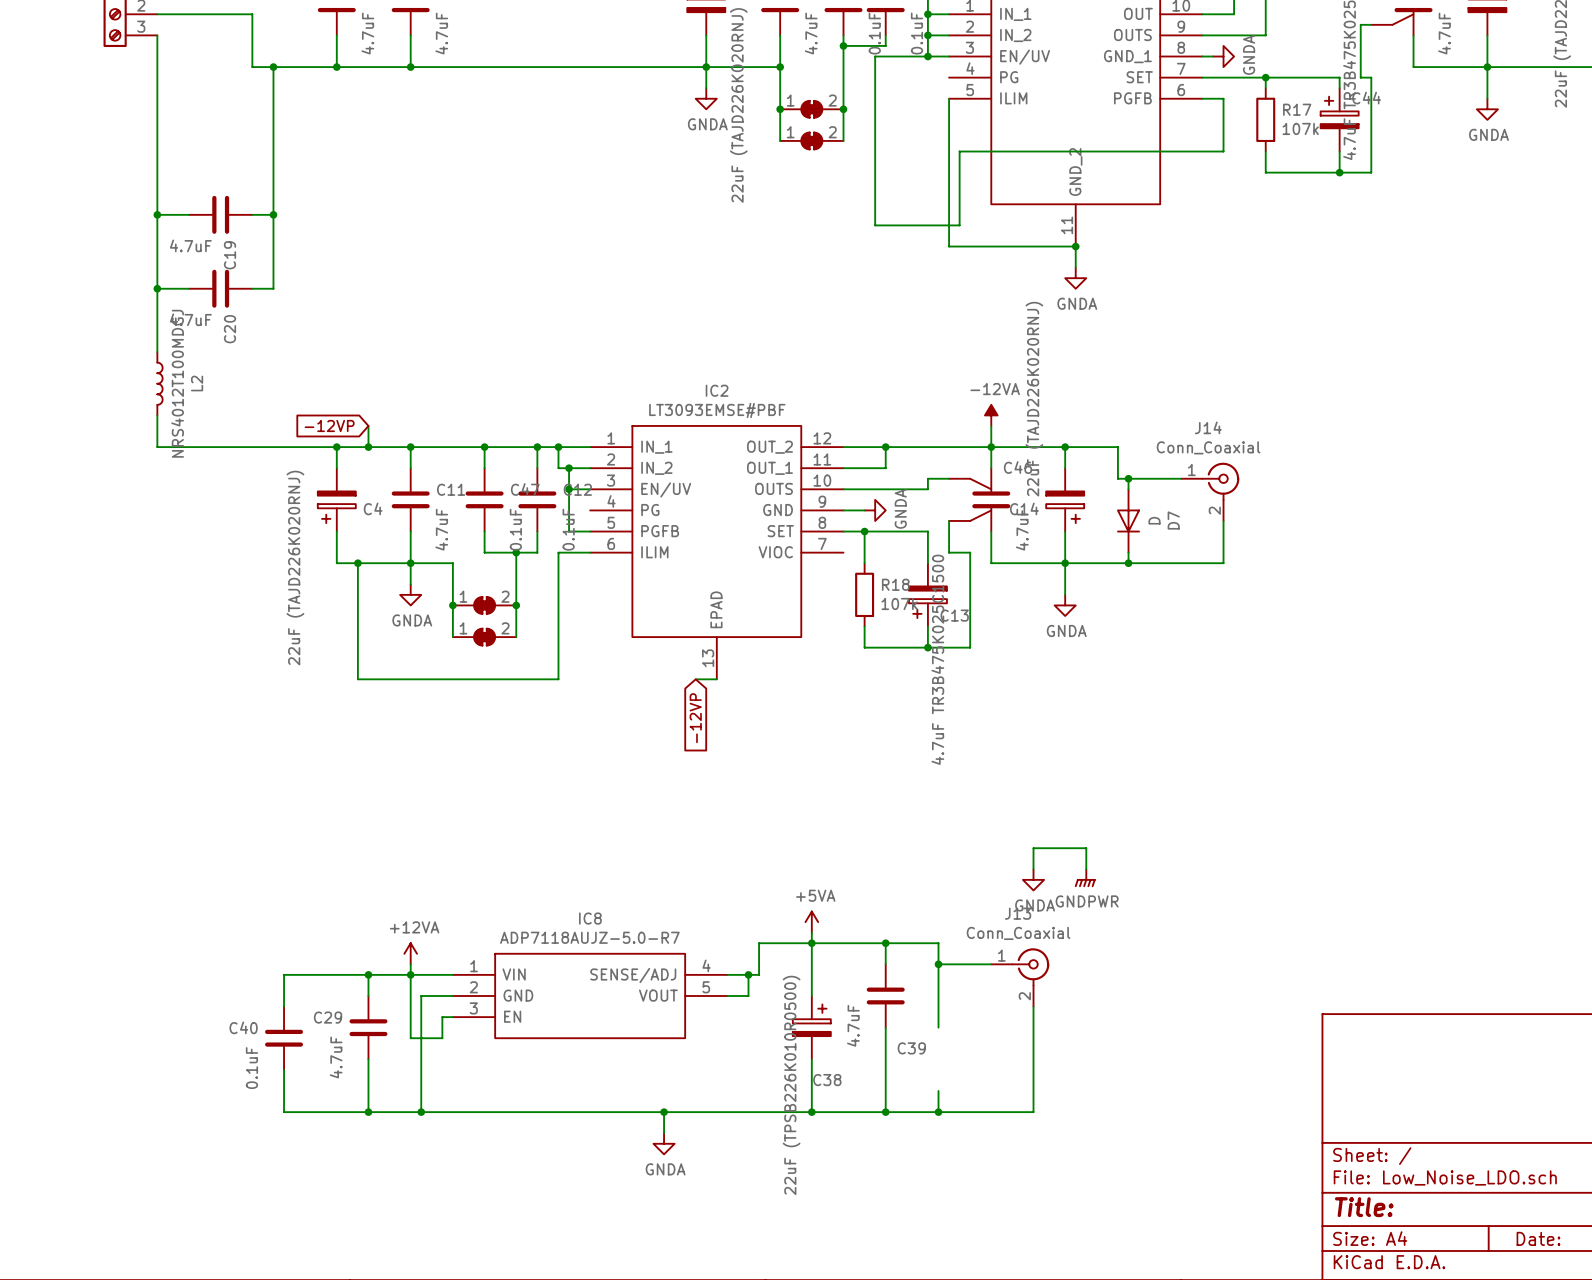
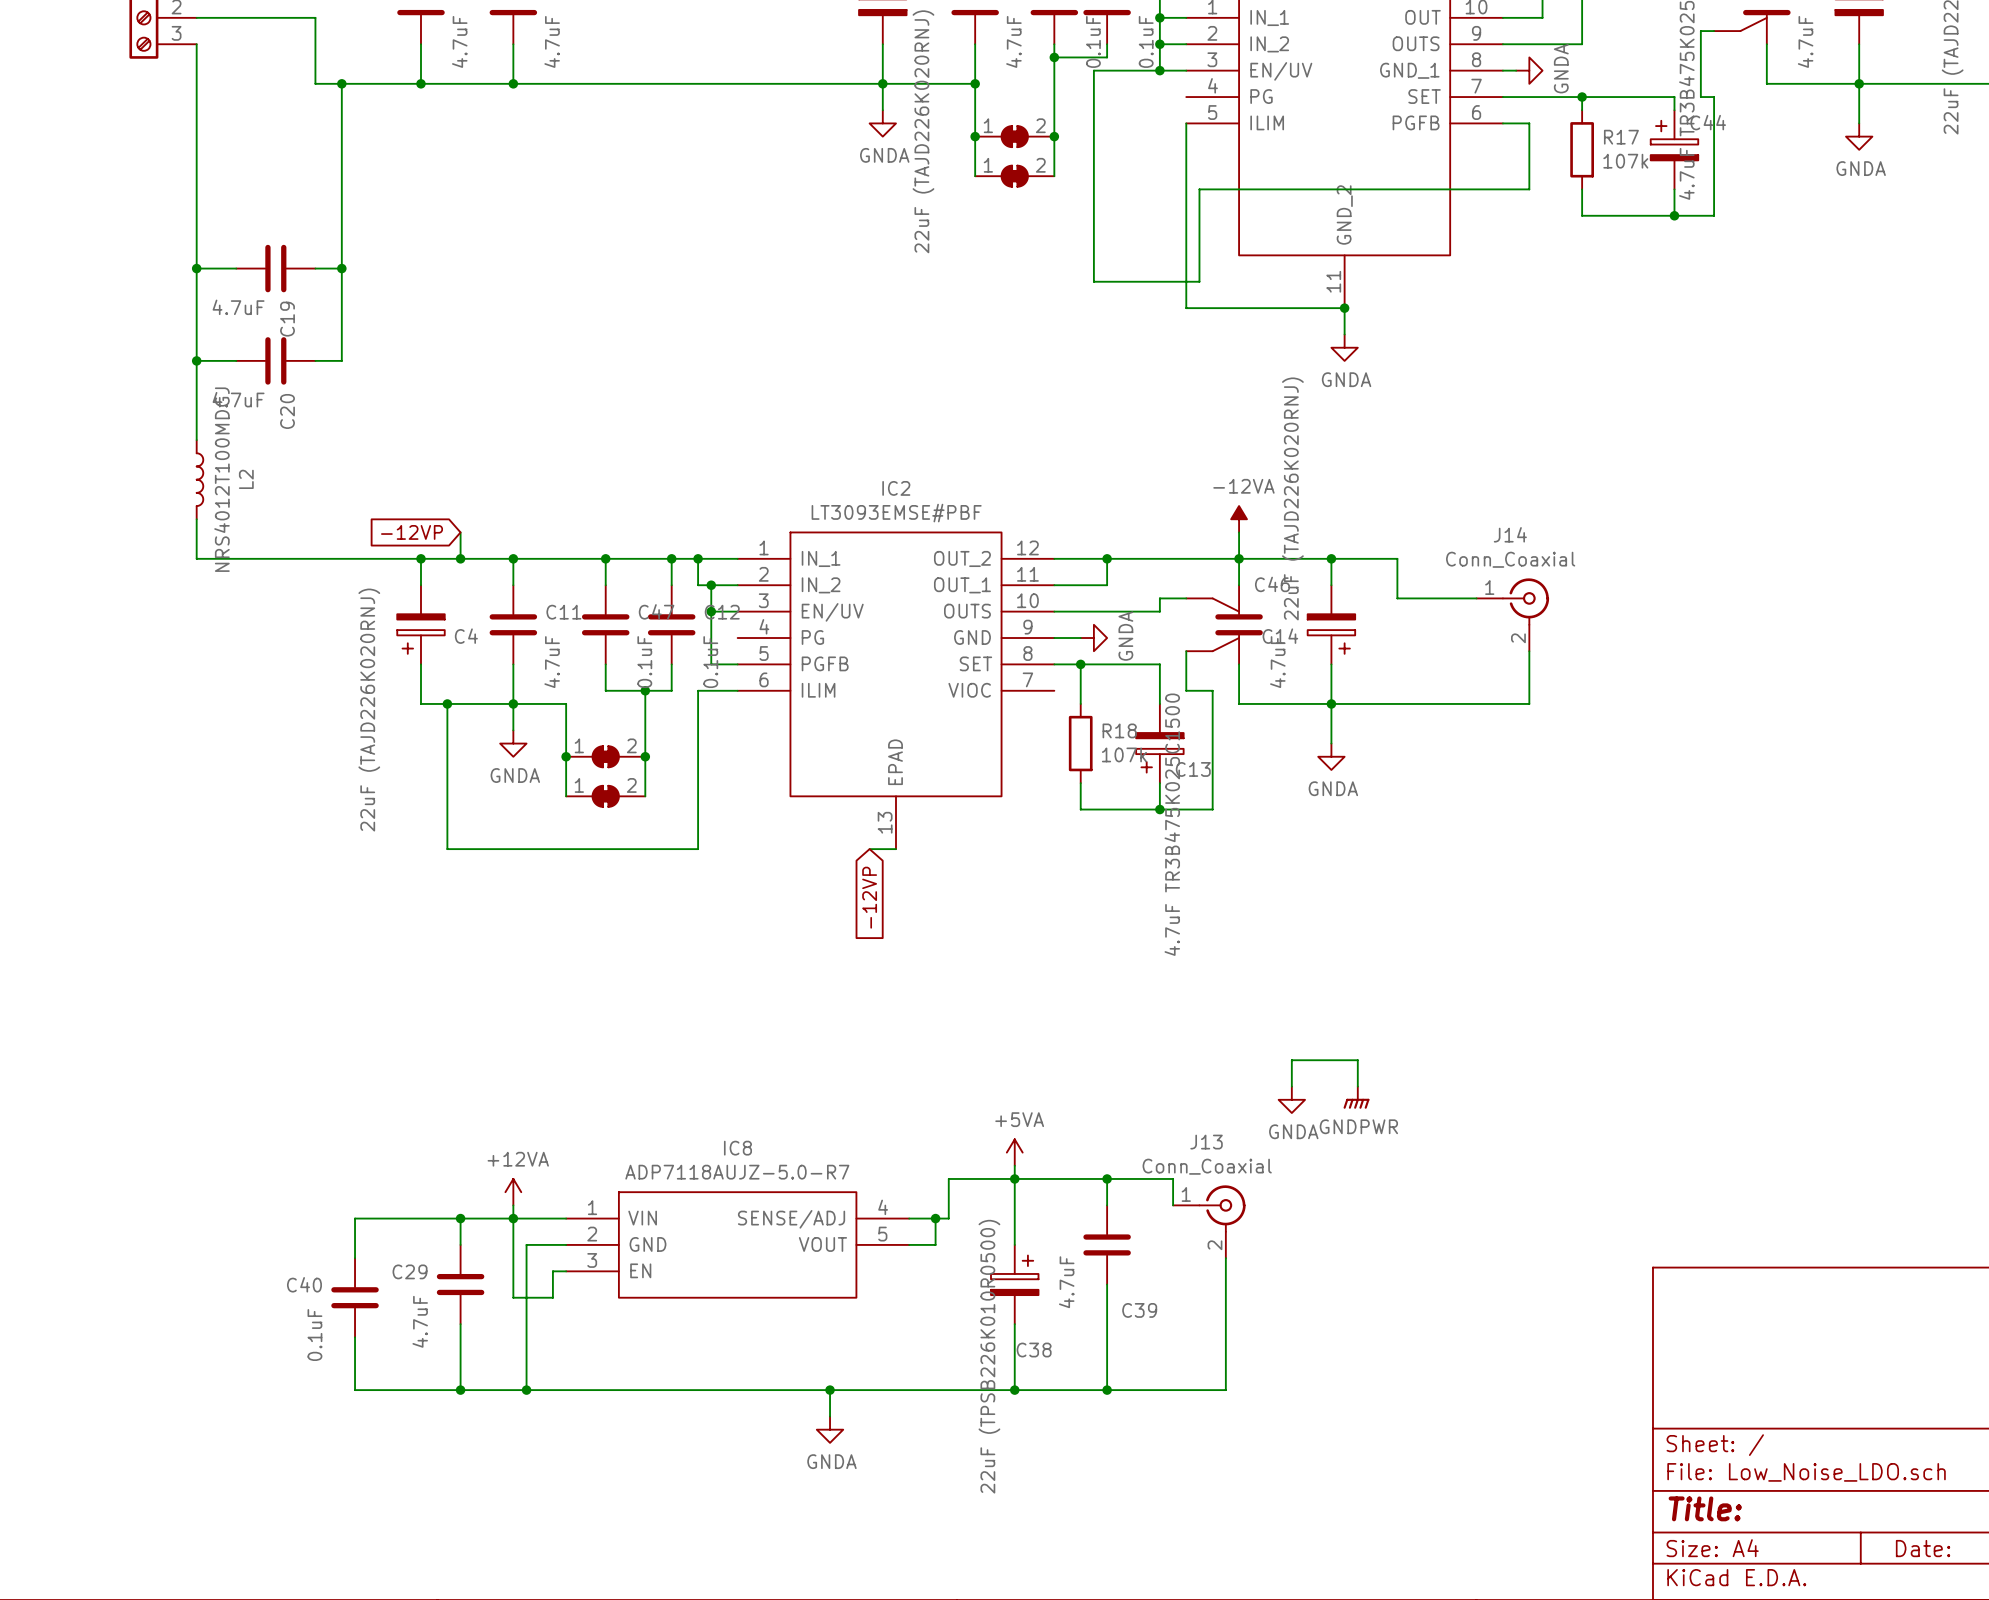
wire: (1128, 478) (1128, 489) -> none
junction: (1128, 478) -> none
D7: D (1128, 520) -> none
wire: (1128, 552) (1128, 563) -> none
junction: (1128, 563) -> none
junction: (938, 964) -> none
wire: (991, 964) (938, 964) (938, 1027) -> none
J13 position: (1020, 977) -> (1209, 1221)
wire: (1033, 1006) (1033, 1112) (980, 1112) -> (1225, 1258) (1225, 1390)
wire: (938, 1091) (938, 1112) -> none
junction: (938, 1112) -> none

